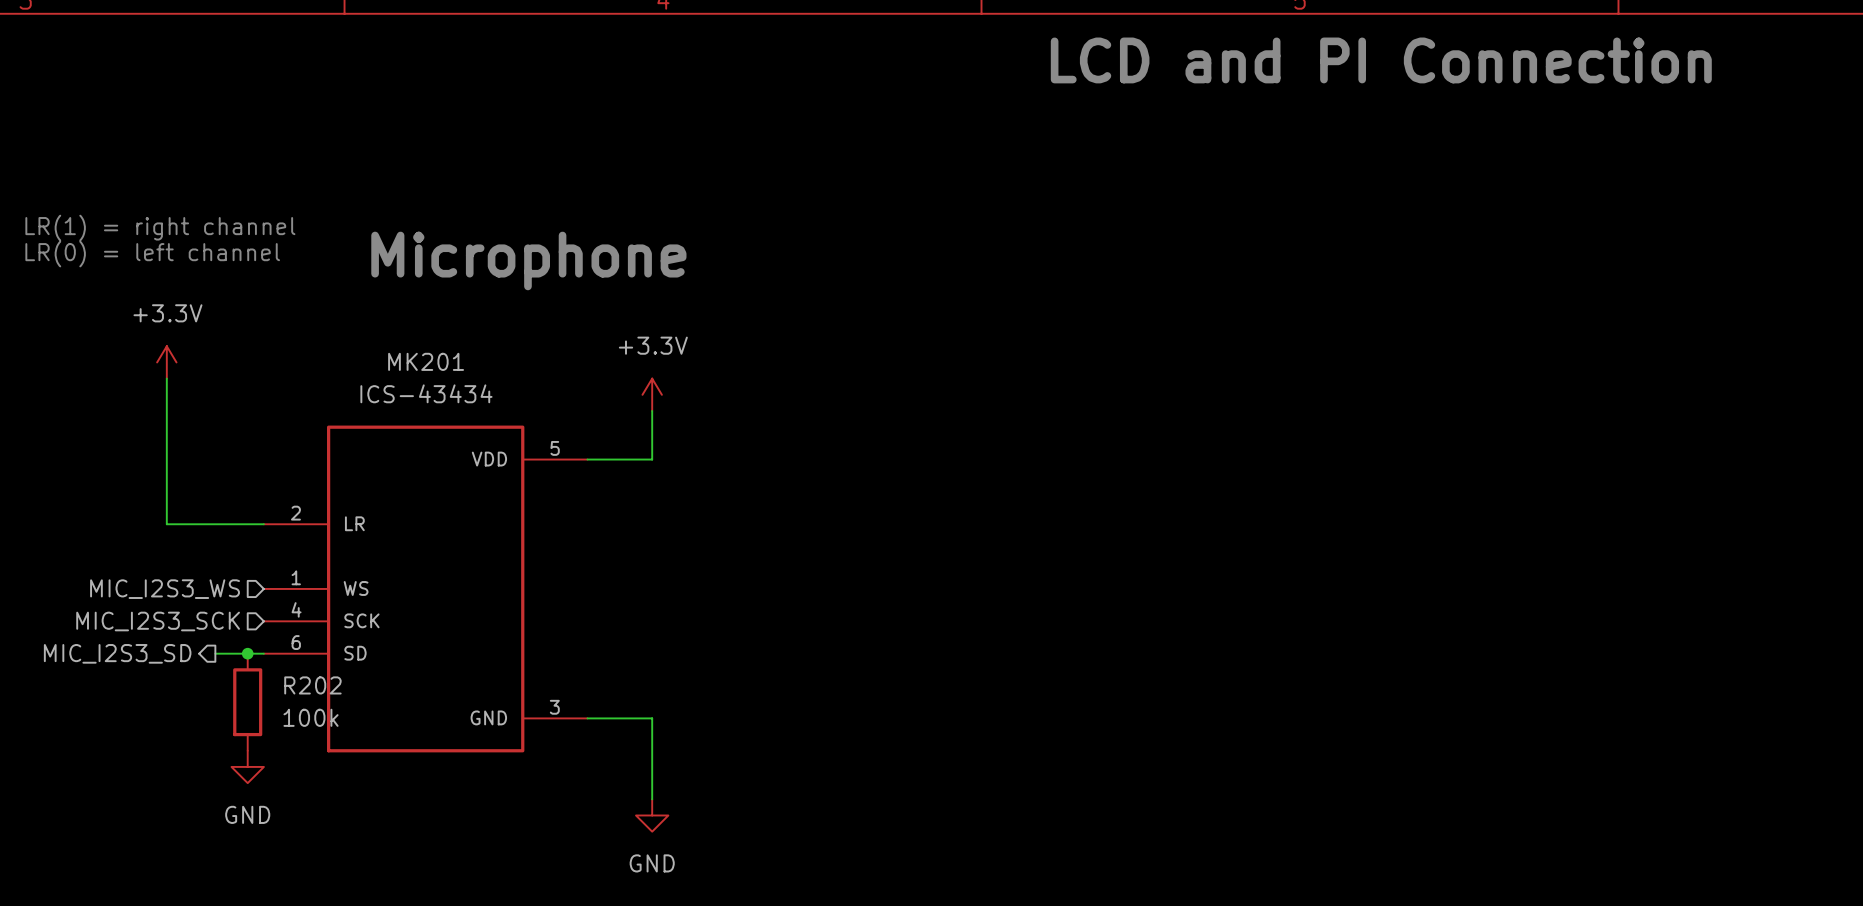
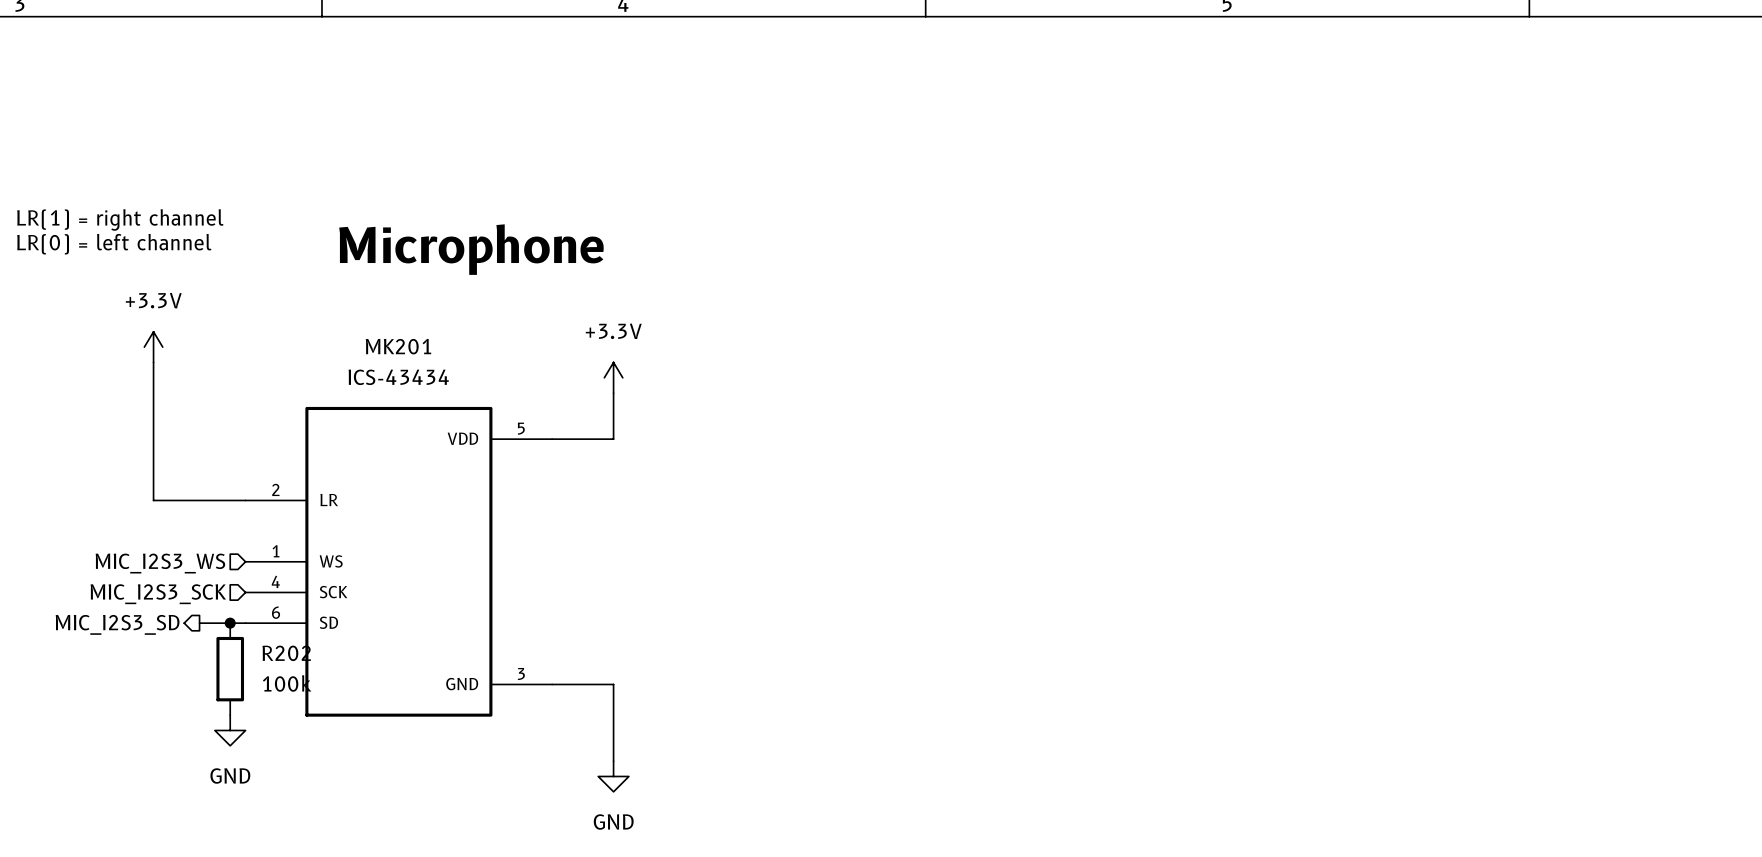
text: LCD and PI Connection (1381, 60) -> none

